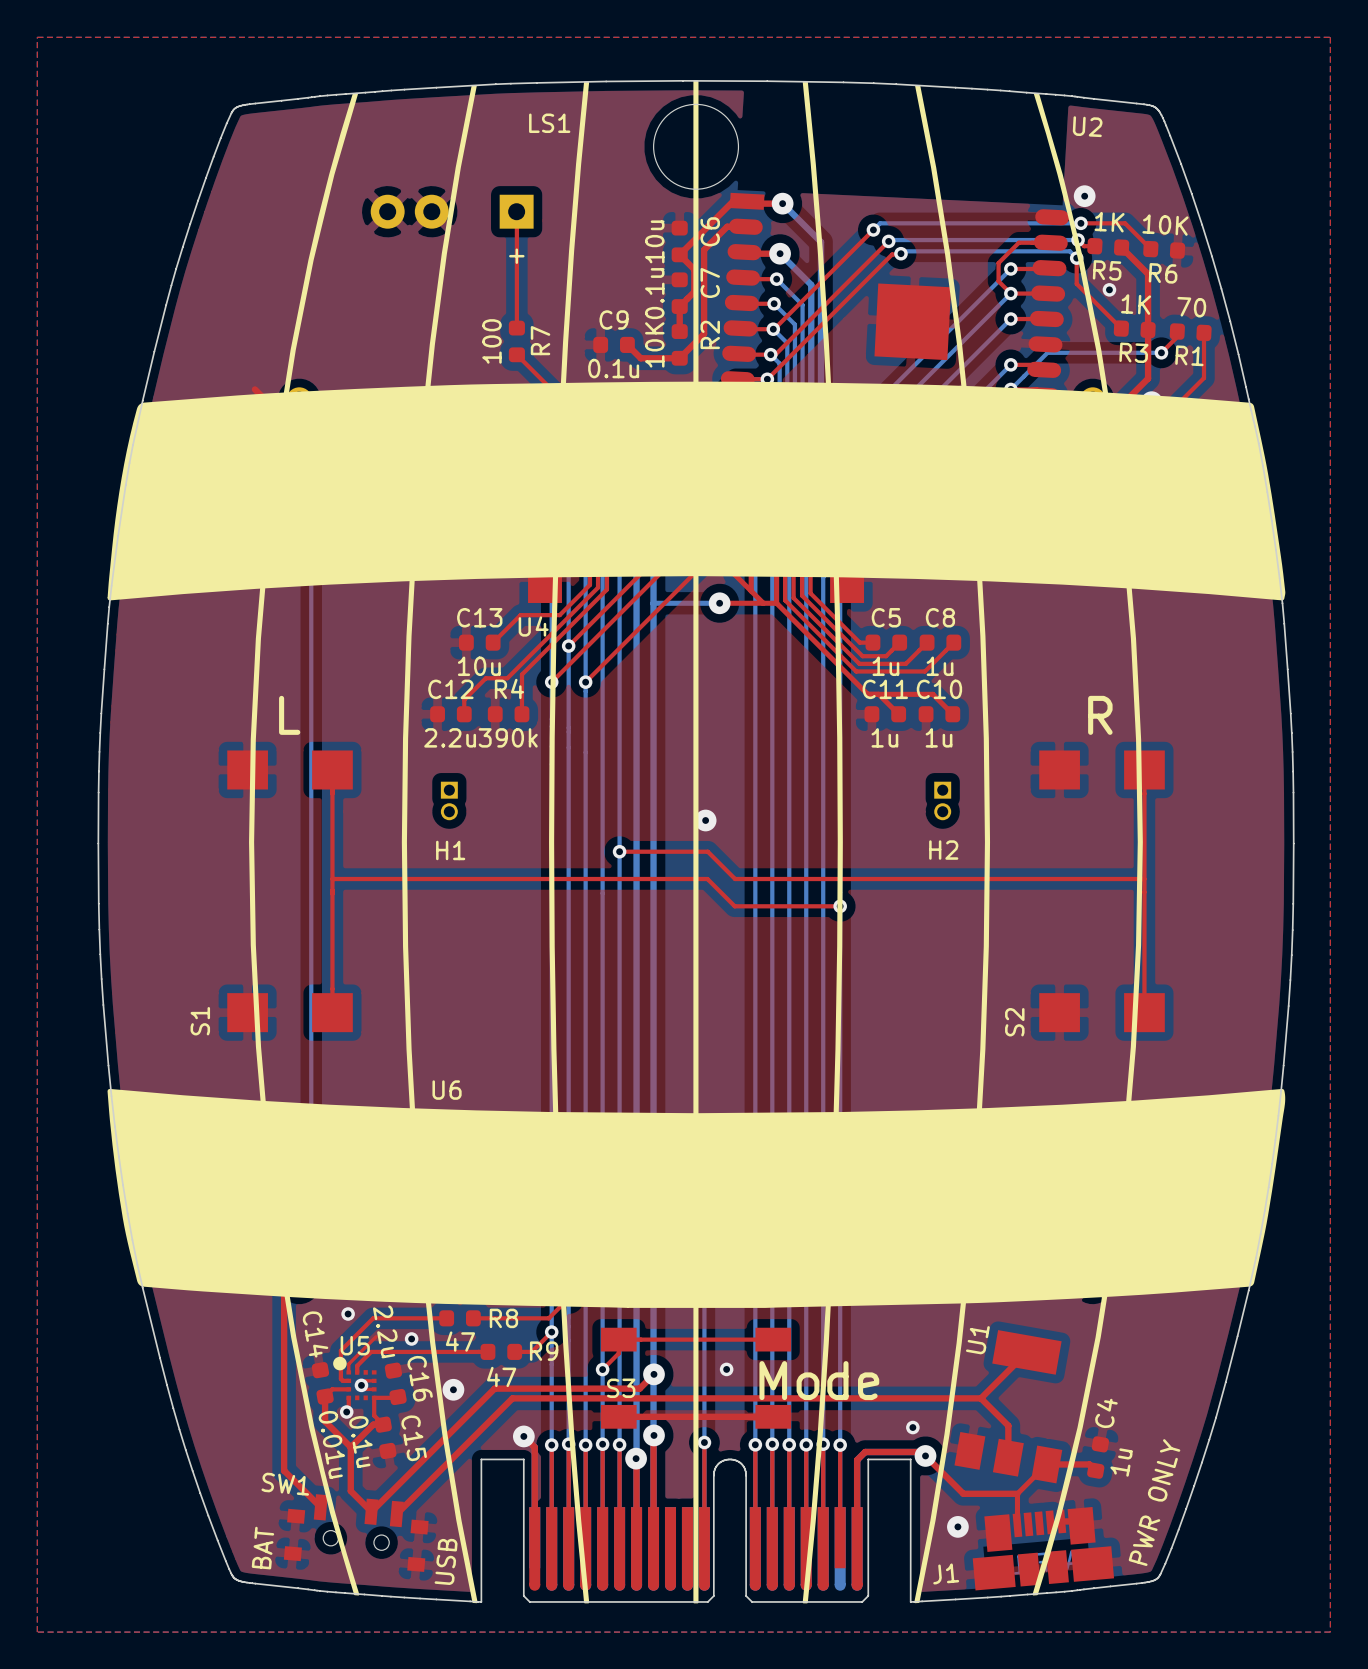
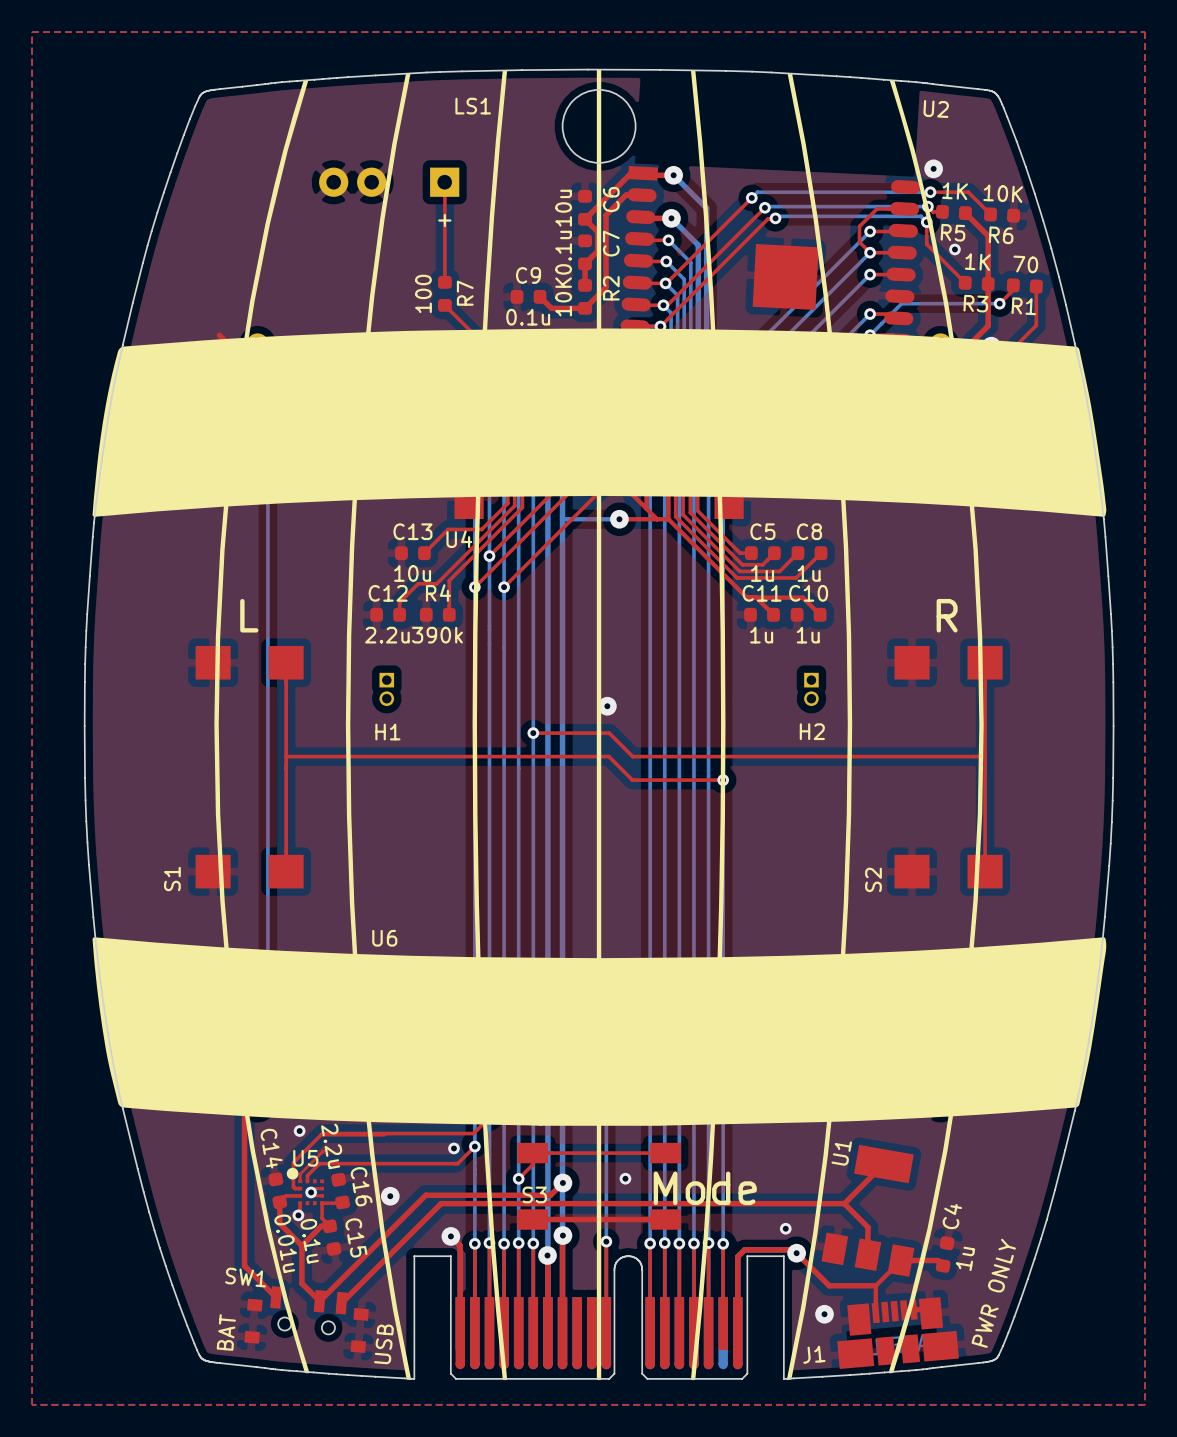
top track: (550, 1316) (473, 1318) -> (473, 1133) (321, 1134)
R8: 47 (460, 1318) -> none
via: none -> (453, 1148)
via: (411, 1338) -> none
top track: none -> (420, 1163) (443, 1163)
R9: 47 (501, 1351) -> none

